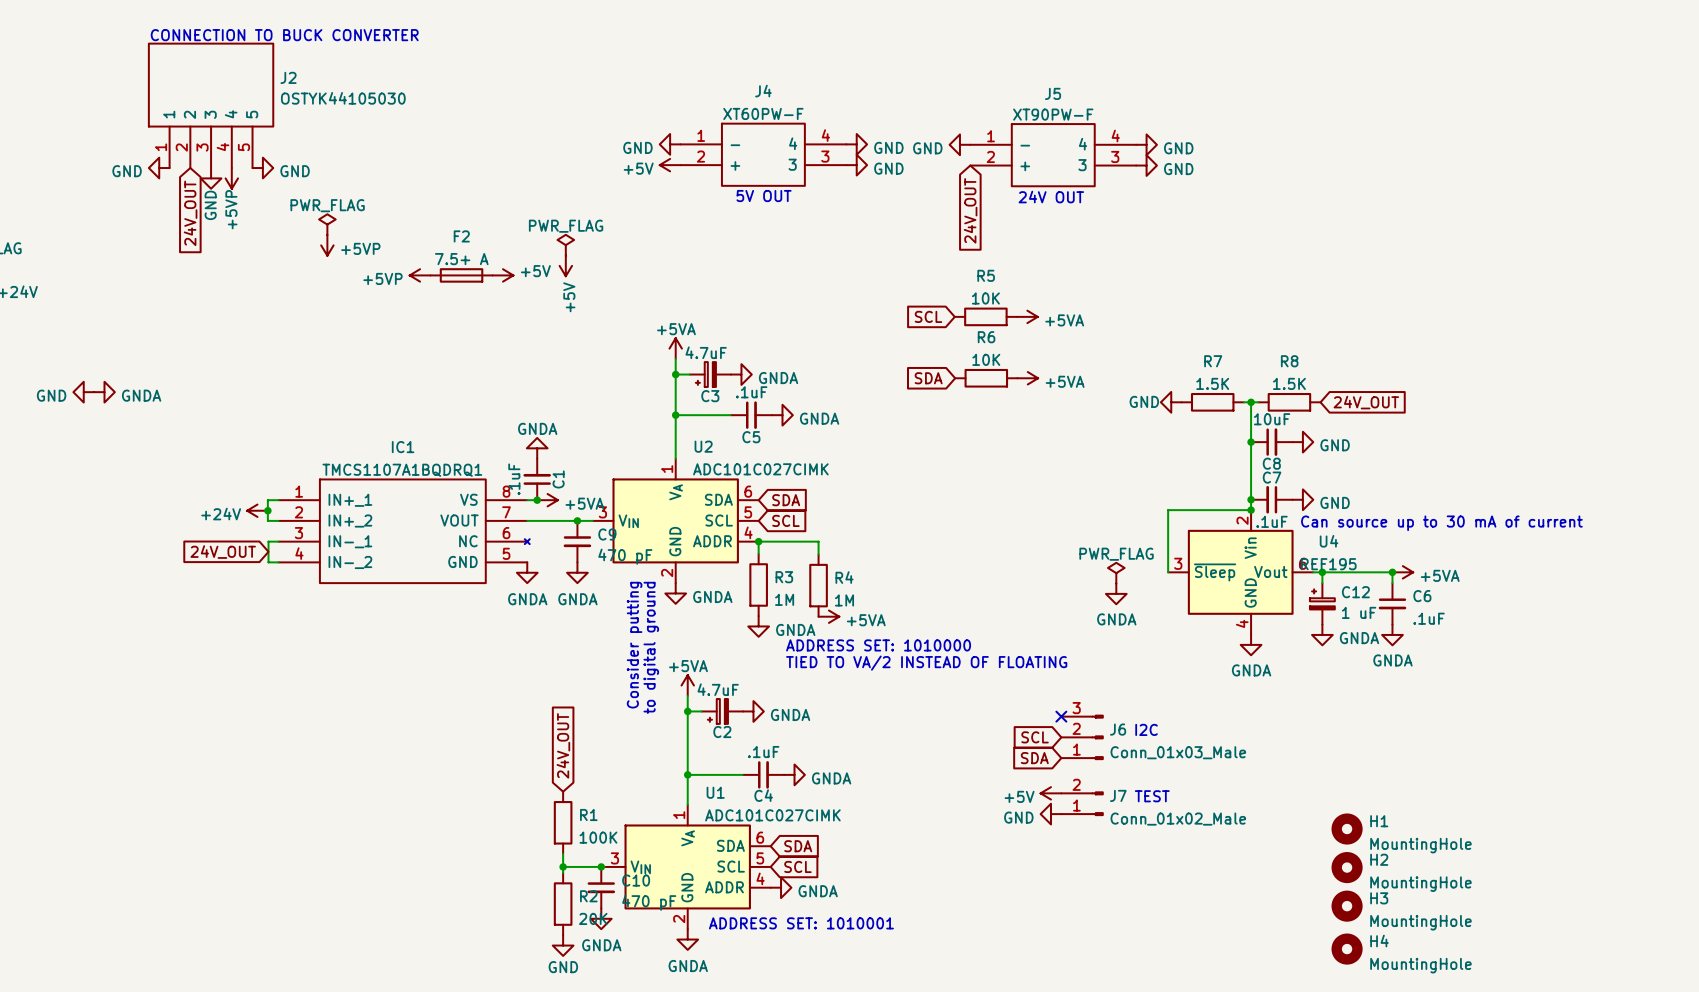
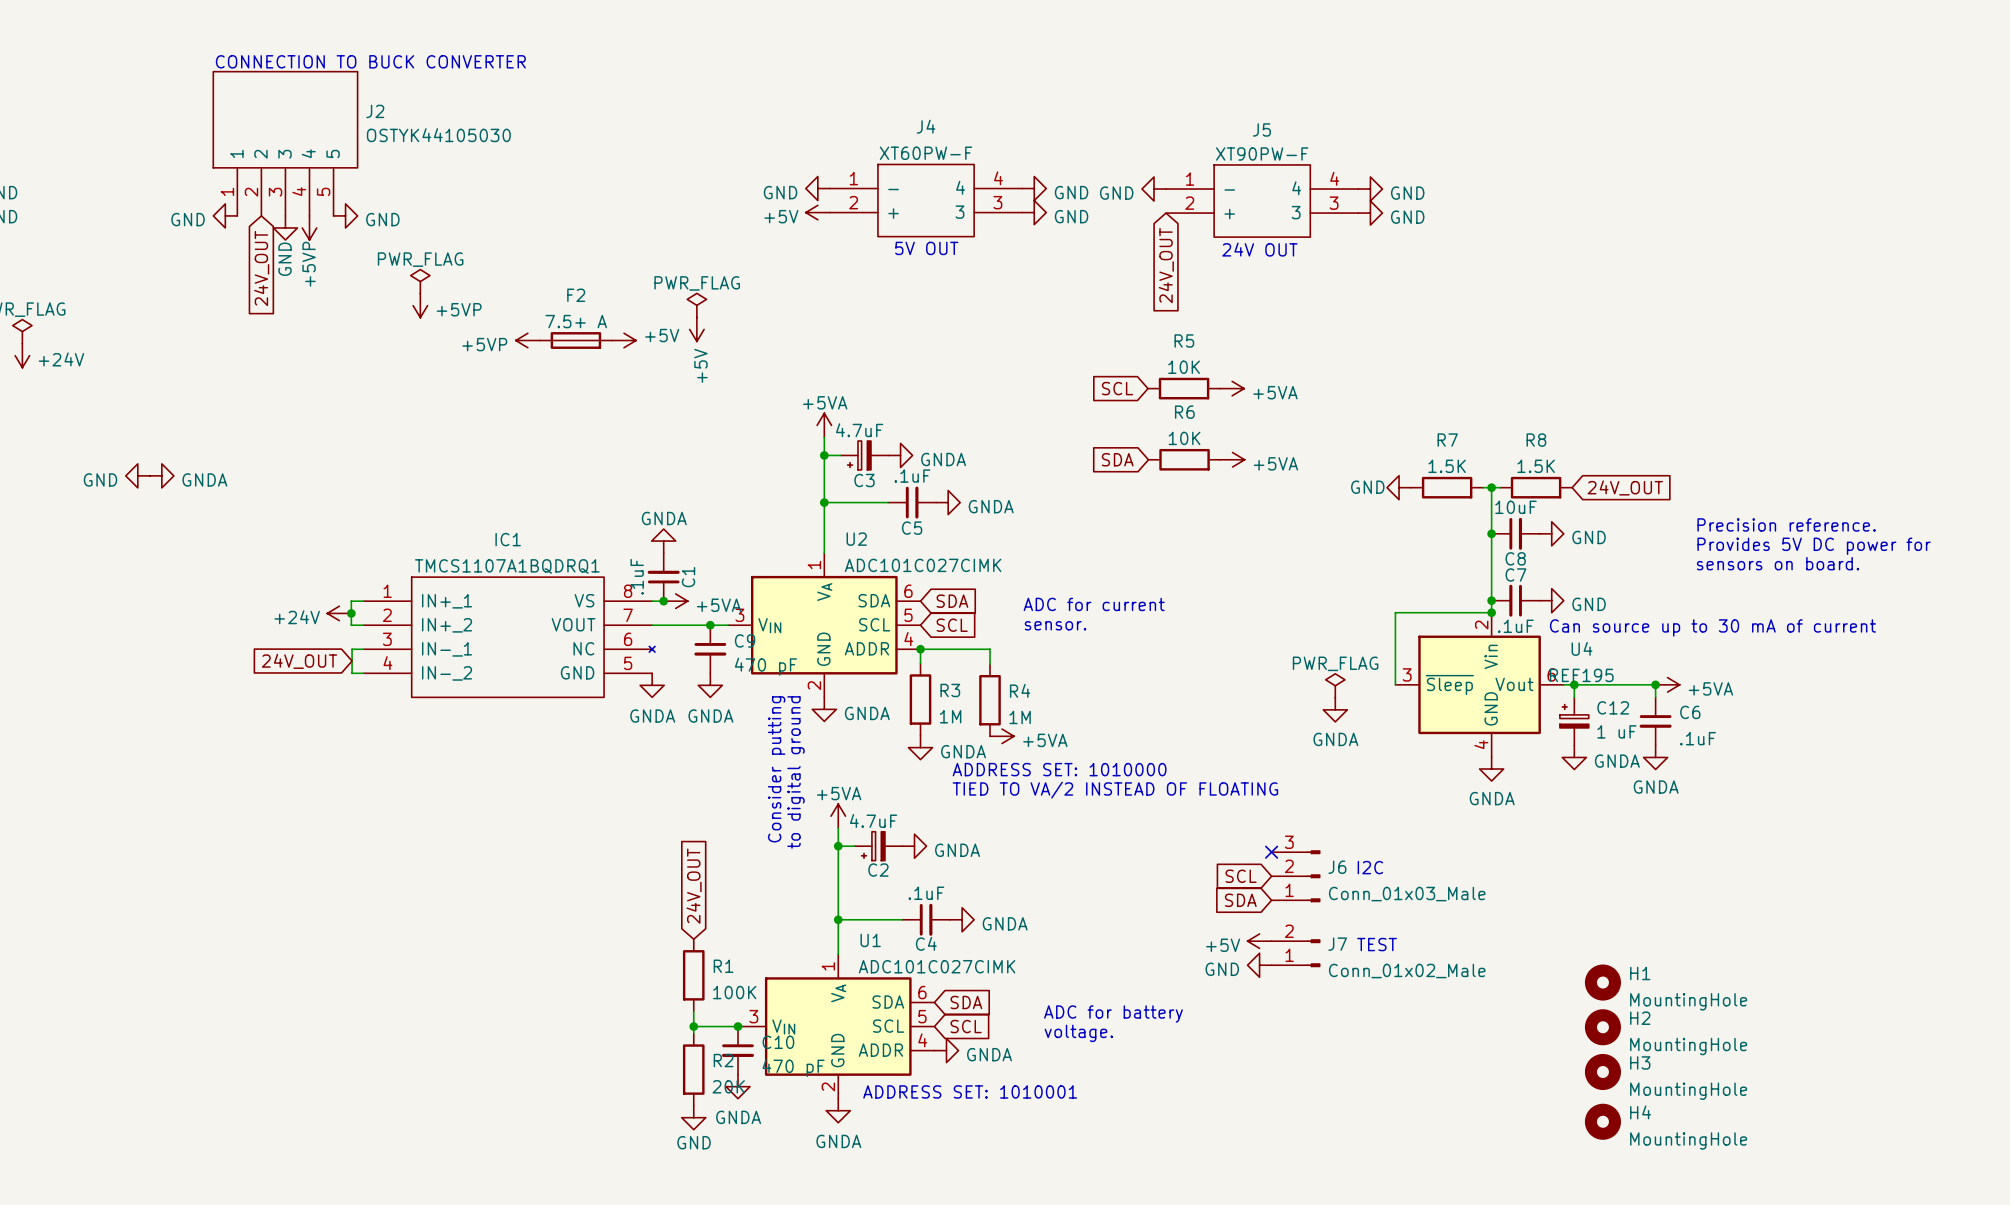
text: none -> Precision reference. (1786, 524)
text: none -> Provides 5V DC power for (1814, 546)
text: none -> sensors on board. (1778, 563)
text: none -> ADC for current (1094, 604)
text: none -> sensor. (1055, 625)
text: none -> ADC for battery (1113, 1014)
text: none -> voltage. (1078, 1033)

